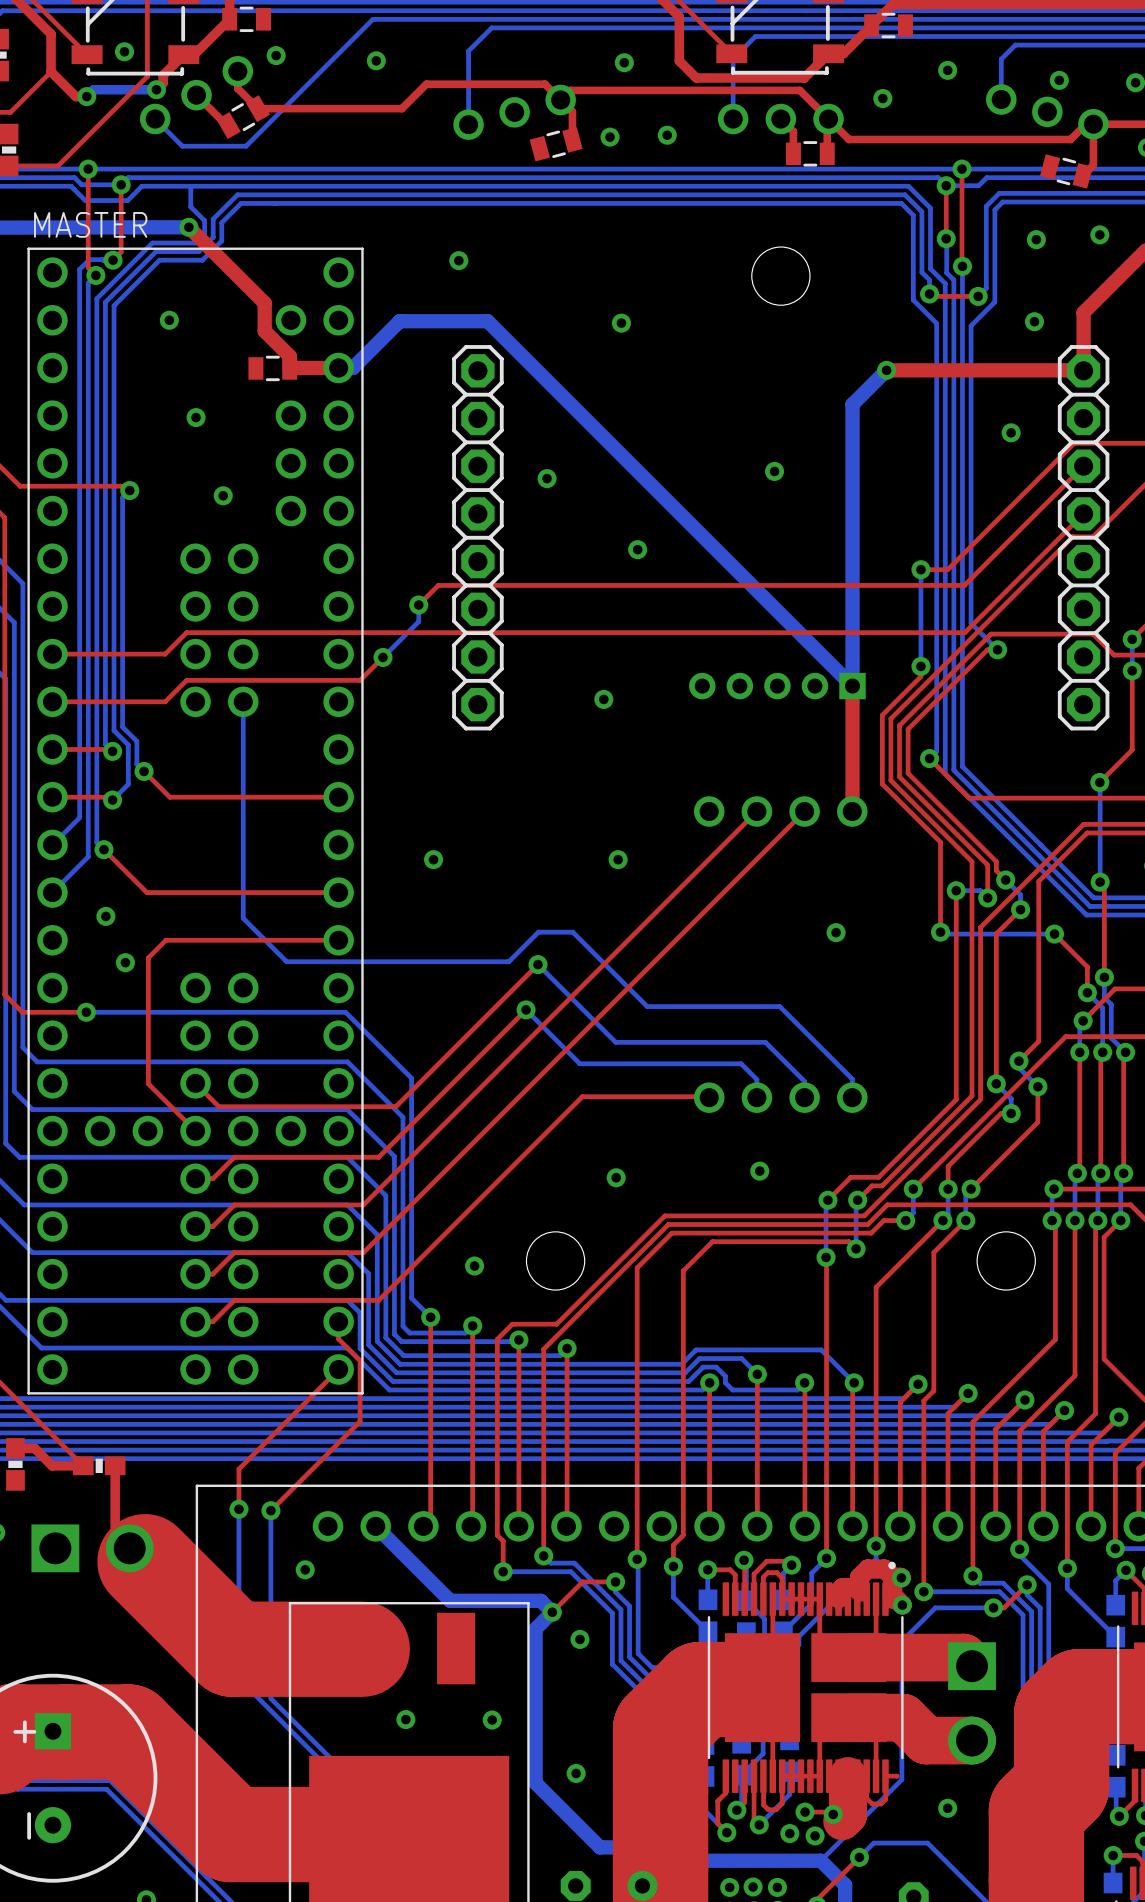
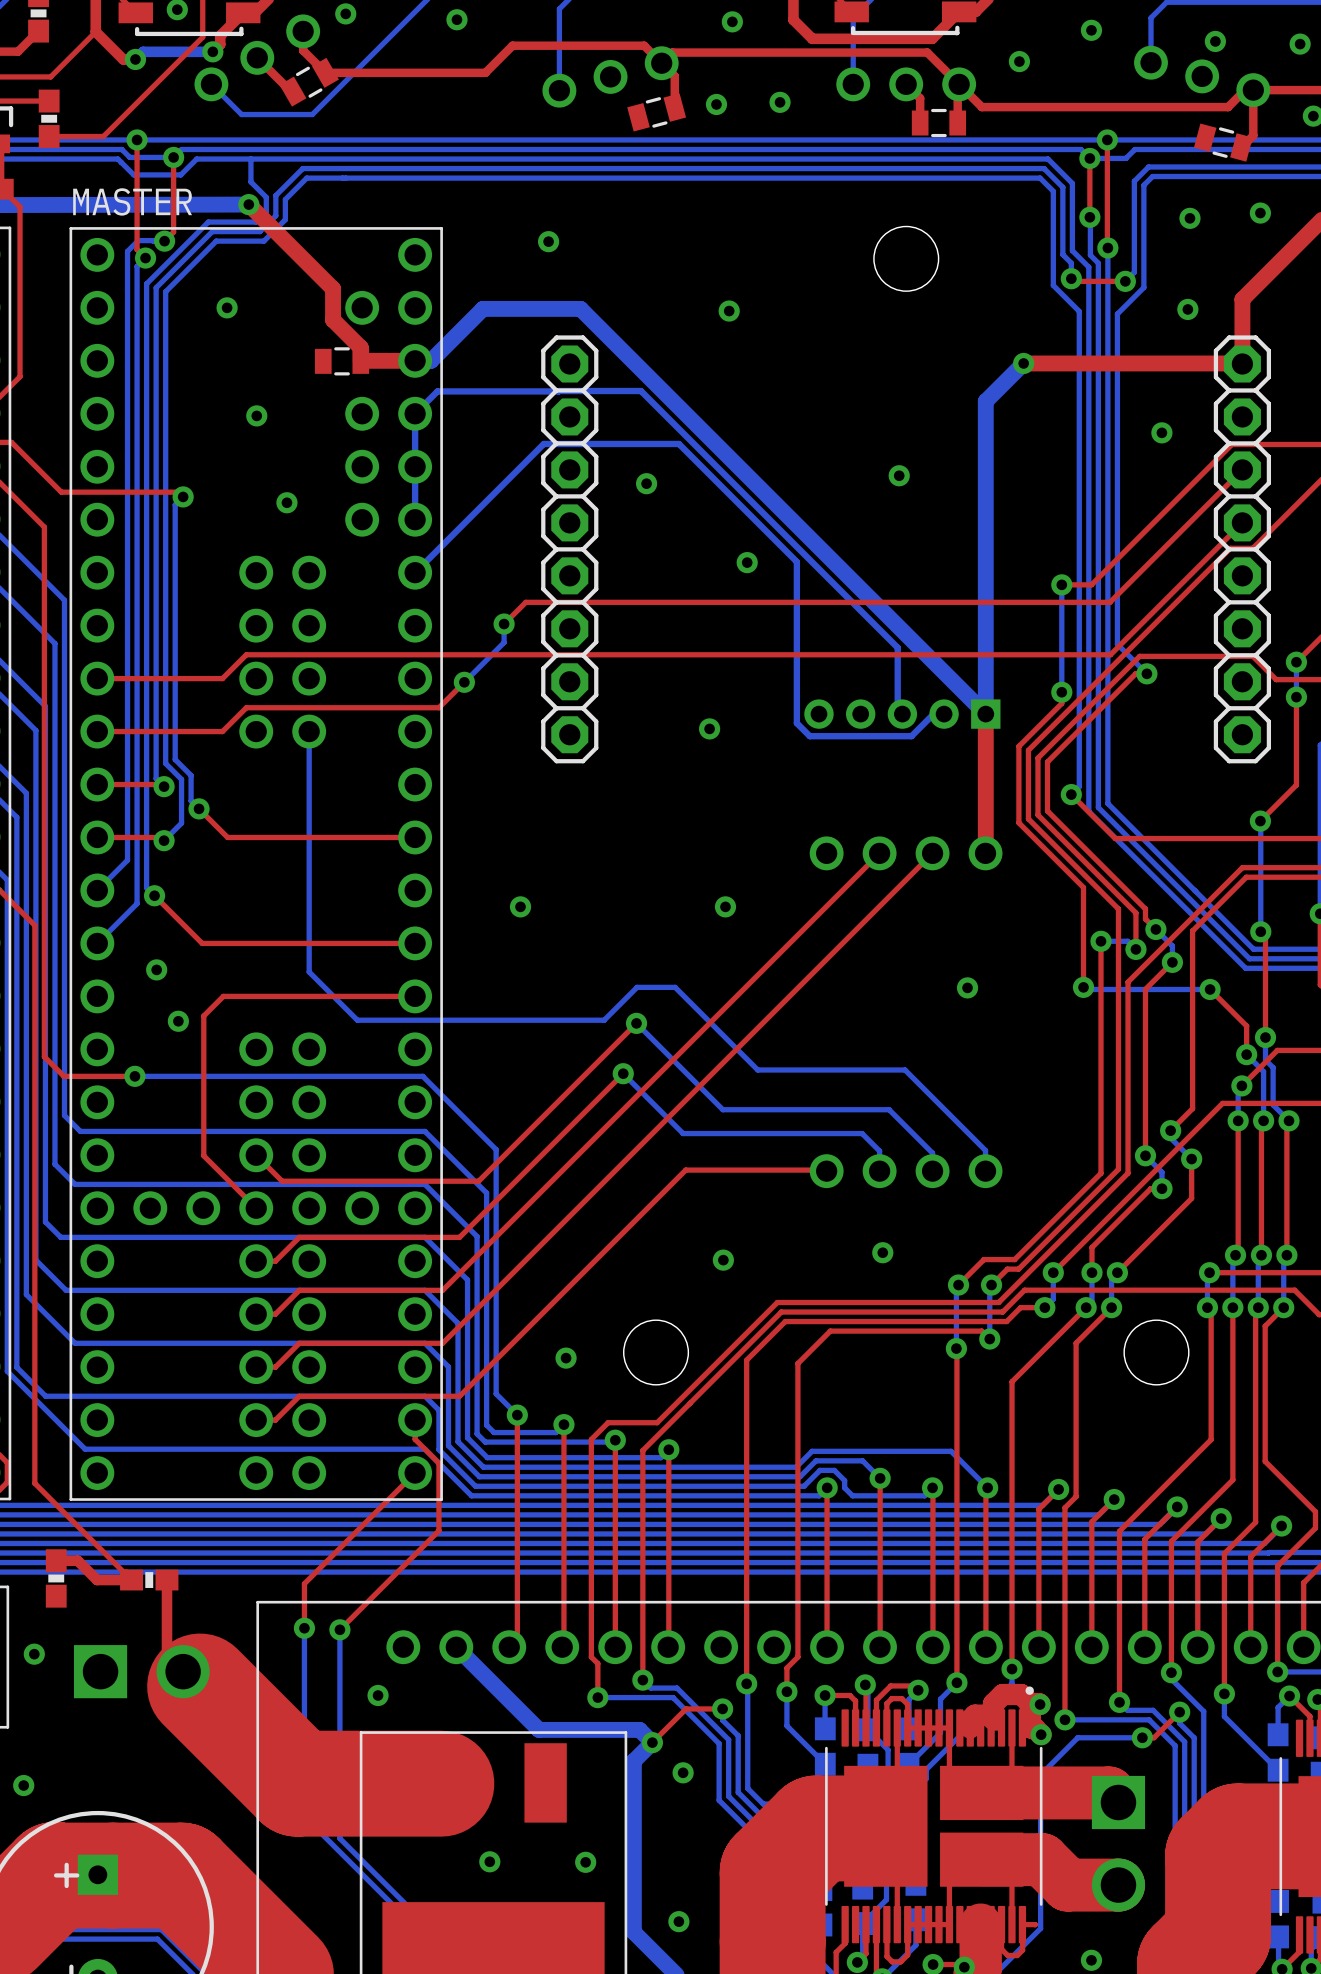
bottom track: none -> (415, 519) (415, 413) (437, 391) (640, 391) (897, 647) (897, 709) (902, 714)
bottom track: none -> (415, 572) (543, 443) (678, 443) (796, 561) (796, 723) (809, 736) (911, 736) (933, 714) (944, 714)

